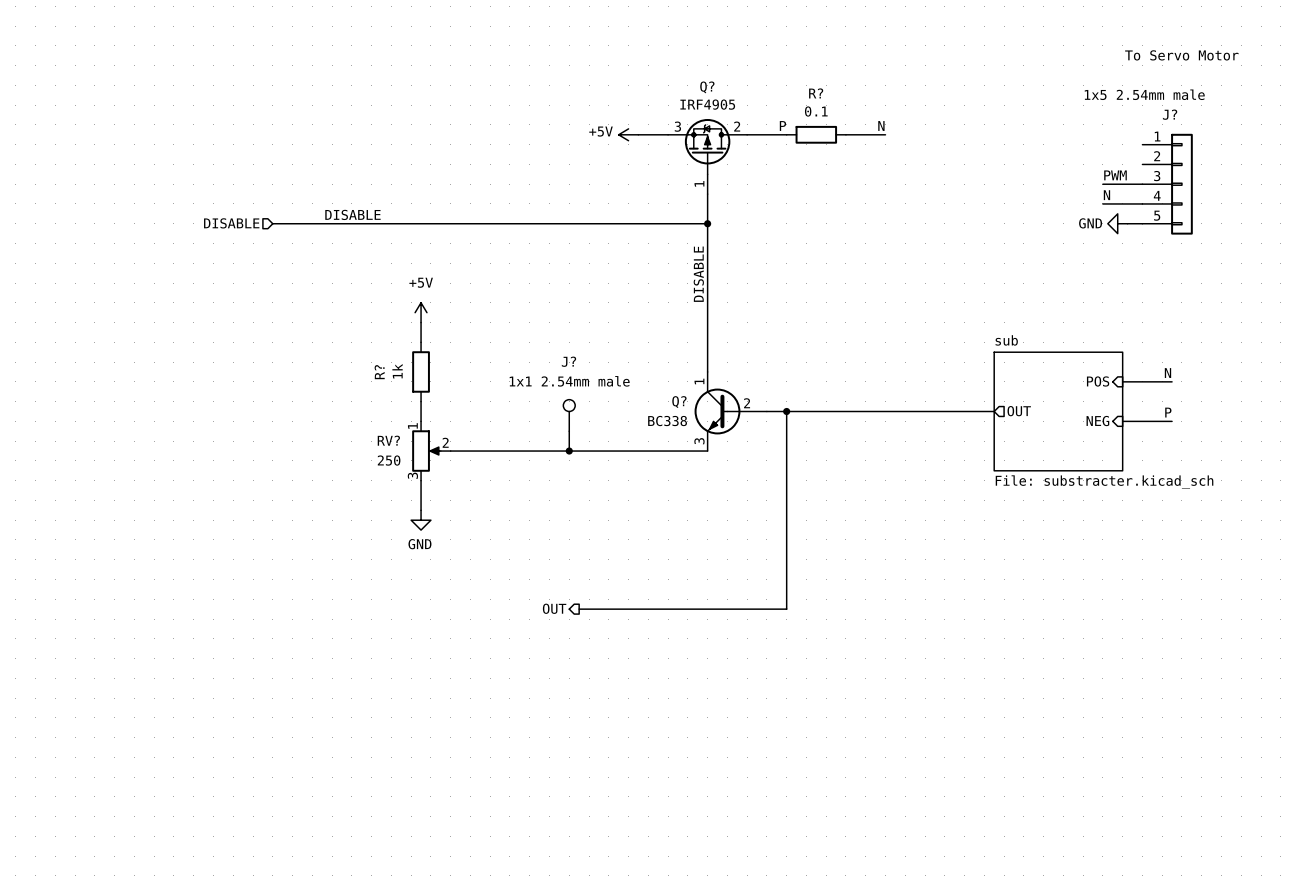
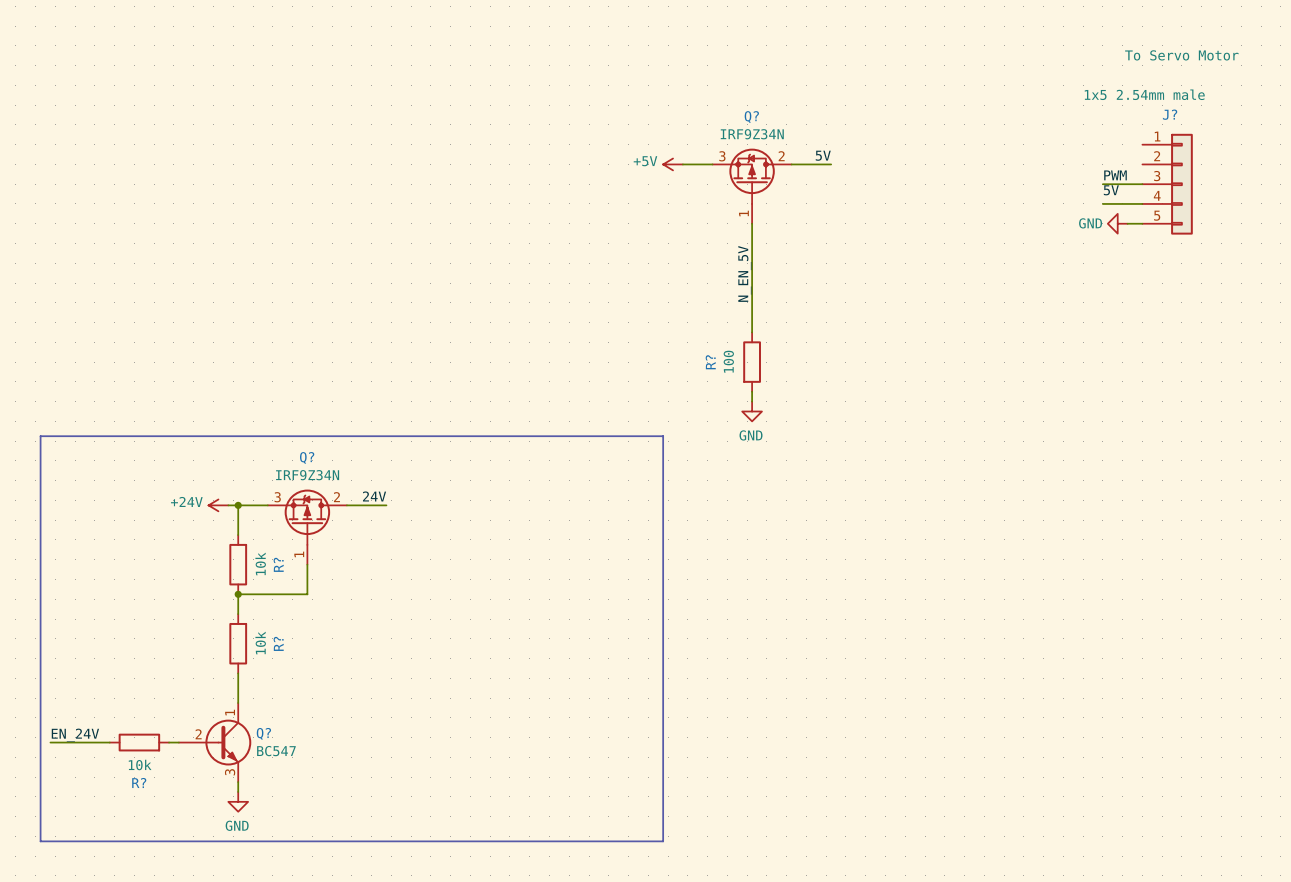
label: P (782, 125) -> none
label: N (881, 125) -> none
power symbol position: +5V (628, 134) -> +5V (673, 164)
wire: (638, 134) (668, 134) -> (682, 164) (712, 164)
wire: (747, 134) (786, 134) -> (791, 164) (831, 164)
R?: 0.1 (816, 134) -> none
wire: (845, 134) (885, 134) -> none
label: none -> 5V (823, 155)
Q?: IRF4905 (707, 156) -> none
Q?: none -> IRF9Z34N (752, 186)
wire: (707, 194) (707, 371) -> none
label: N (1106, 195) -> 5V (1111, 190)
label: DISABLE (352, 214) -> none
hierarchical label: DISABLE (231, 223) -> none
wire: (272, 223) (707, 223) -> none
junction: (707, 223) -> none
wire: none -> (752, 223) (752, 332)
label: none -> N_EN_5V (744, 273)
label: DISABLE (698, 274) -> none
power symbol: +5V (421, 312) -> none
wire: (421, 322) (421, 342) -> none
R?: none -> 100 (752, 362)
R?: 1k (421, 371) -> none
label: N (1167, 373) -> none
sheet pin: POS (1098, 381) -> none
wire: (1122, 381) (1172, 381) -> none
wire: none -> (752, 391) (752, 401)
wire: (421, 401) (421, 421) -> none
Q?: BC338 (730, 411) -> none
power symbol: none -> GND (752, 411)
wire: (766, 411) (994, 411) -> none
wire: (786, 411) (786, 609) (579, 609) -> none
junction: (786, 411) -> none
sheet pin: OUT (1019, 411) -> none
sheet sub: File: substracter.kicad_sch (1058, 411) -> none
label: P (1168, 412) -> none
J?: 1x1 2.54mm male (569, 415) -> none
sheet pin: NEG (1097, 421) -> none
wire: (1122, 421) (1172, 421) -> none
wire: (569, 431) (569, 451) -> none
line: none -> (40, 436) (40, 841) (663, 841) (663, 436) (40, 436)
RV?: 250 (431, 451) -> none
wire: (450, 451) (707, 451) -> none
junction: (569, 451) -> none
wire: (421, 480) (421, 510) -> (238, 505) (238, 535)
label: none -> 24V (374, 496)
power symbol: none -> +24V (218, 505)
wire: none -> (228, 505) (267, 505)
junction: none -> (238, 505)
wire: none -> (346, 505) (386, 505)
power symbol: GND (421, 520) -> none
Q?: none -> IRF9Z34N (307, 527)
R?: none -> 10k (238, 564)
wire: none -> (307, 564) (307, 594) (238, 594) (238, 614)
junction: none -> (238, 594)
hierarchical label: OUT (554, 608) -> none
R?: none -> 10k (238, 643)
wire: none -> (238, 673) (238, 703)
label: none -> EN_24V (75, 735)
wire: none -> (50, 742) (109, 742)
R?: none -> 10k (139, 742)
wire: none -> (169, 742) (178, 742)
Q?: none -> BC547 (215, 742)
wire: none -> (238, 782) (238, 791)
power symbol: none -> GND (238, 801)

